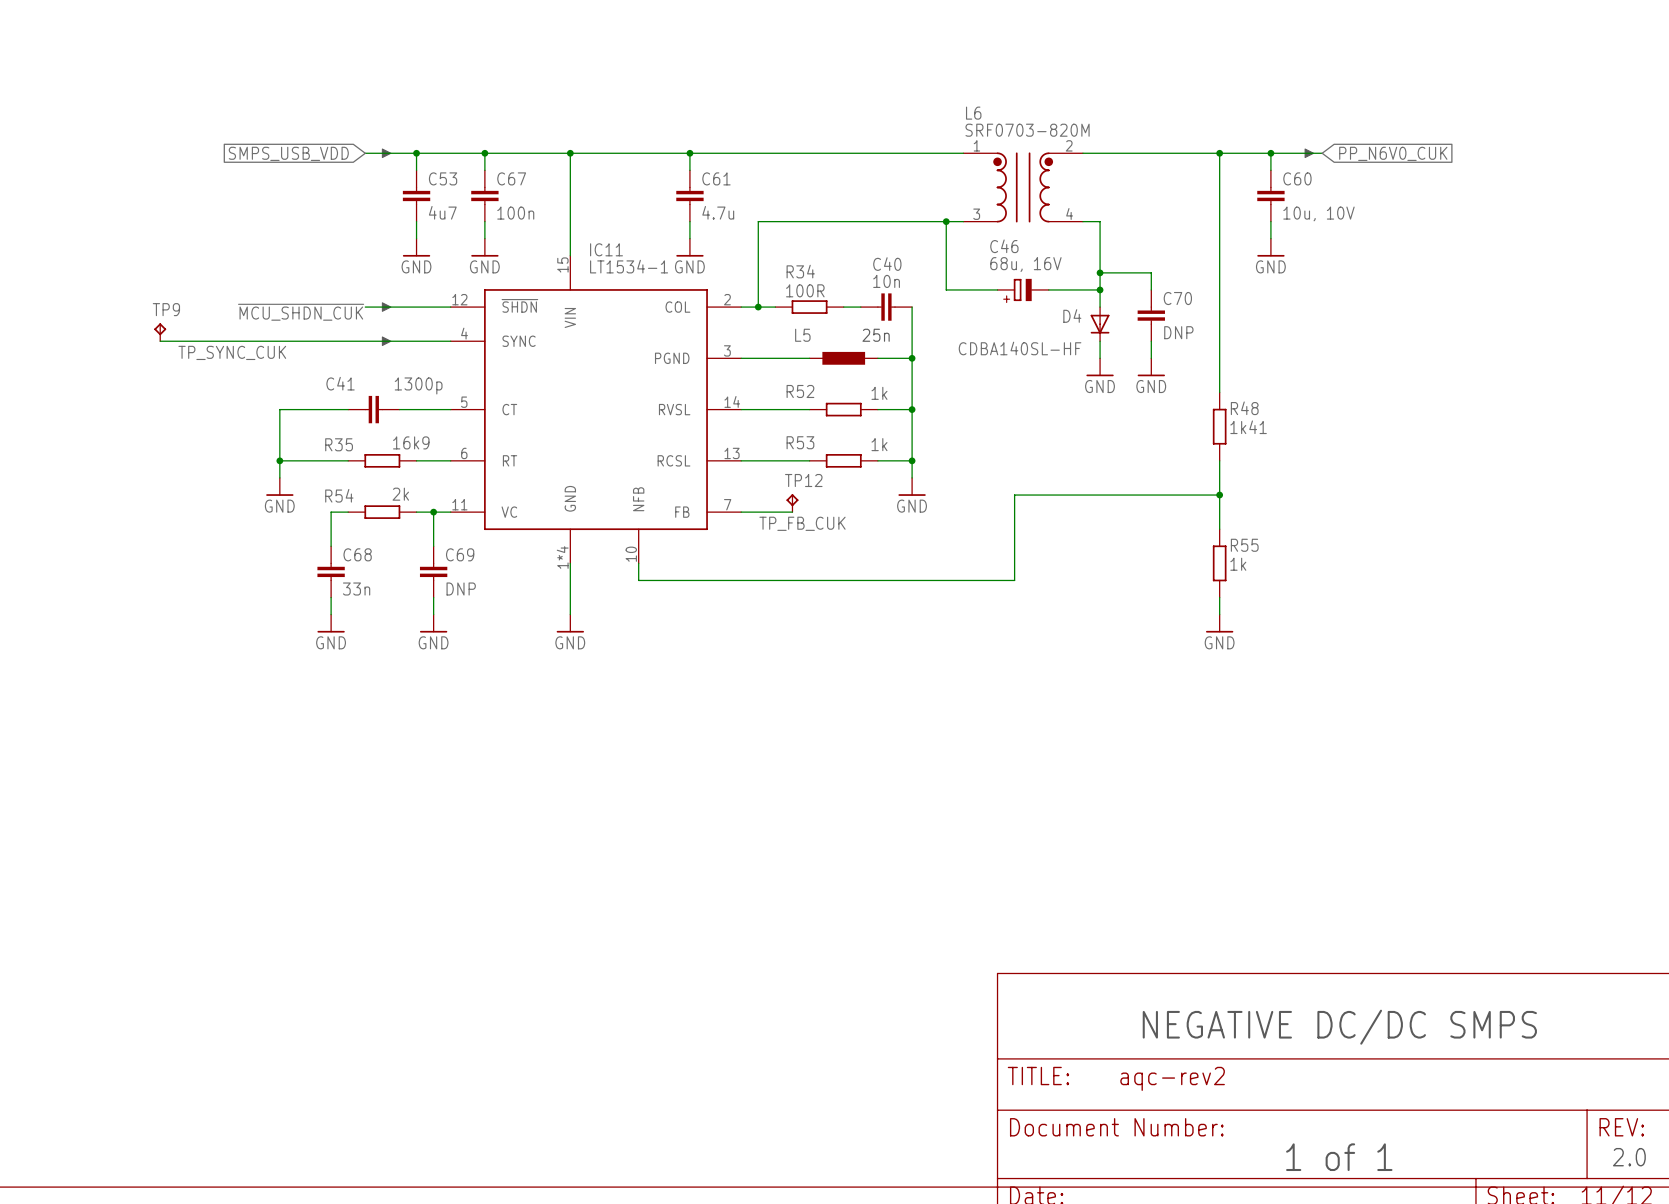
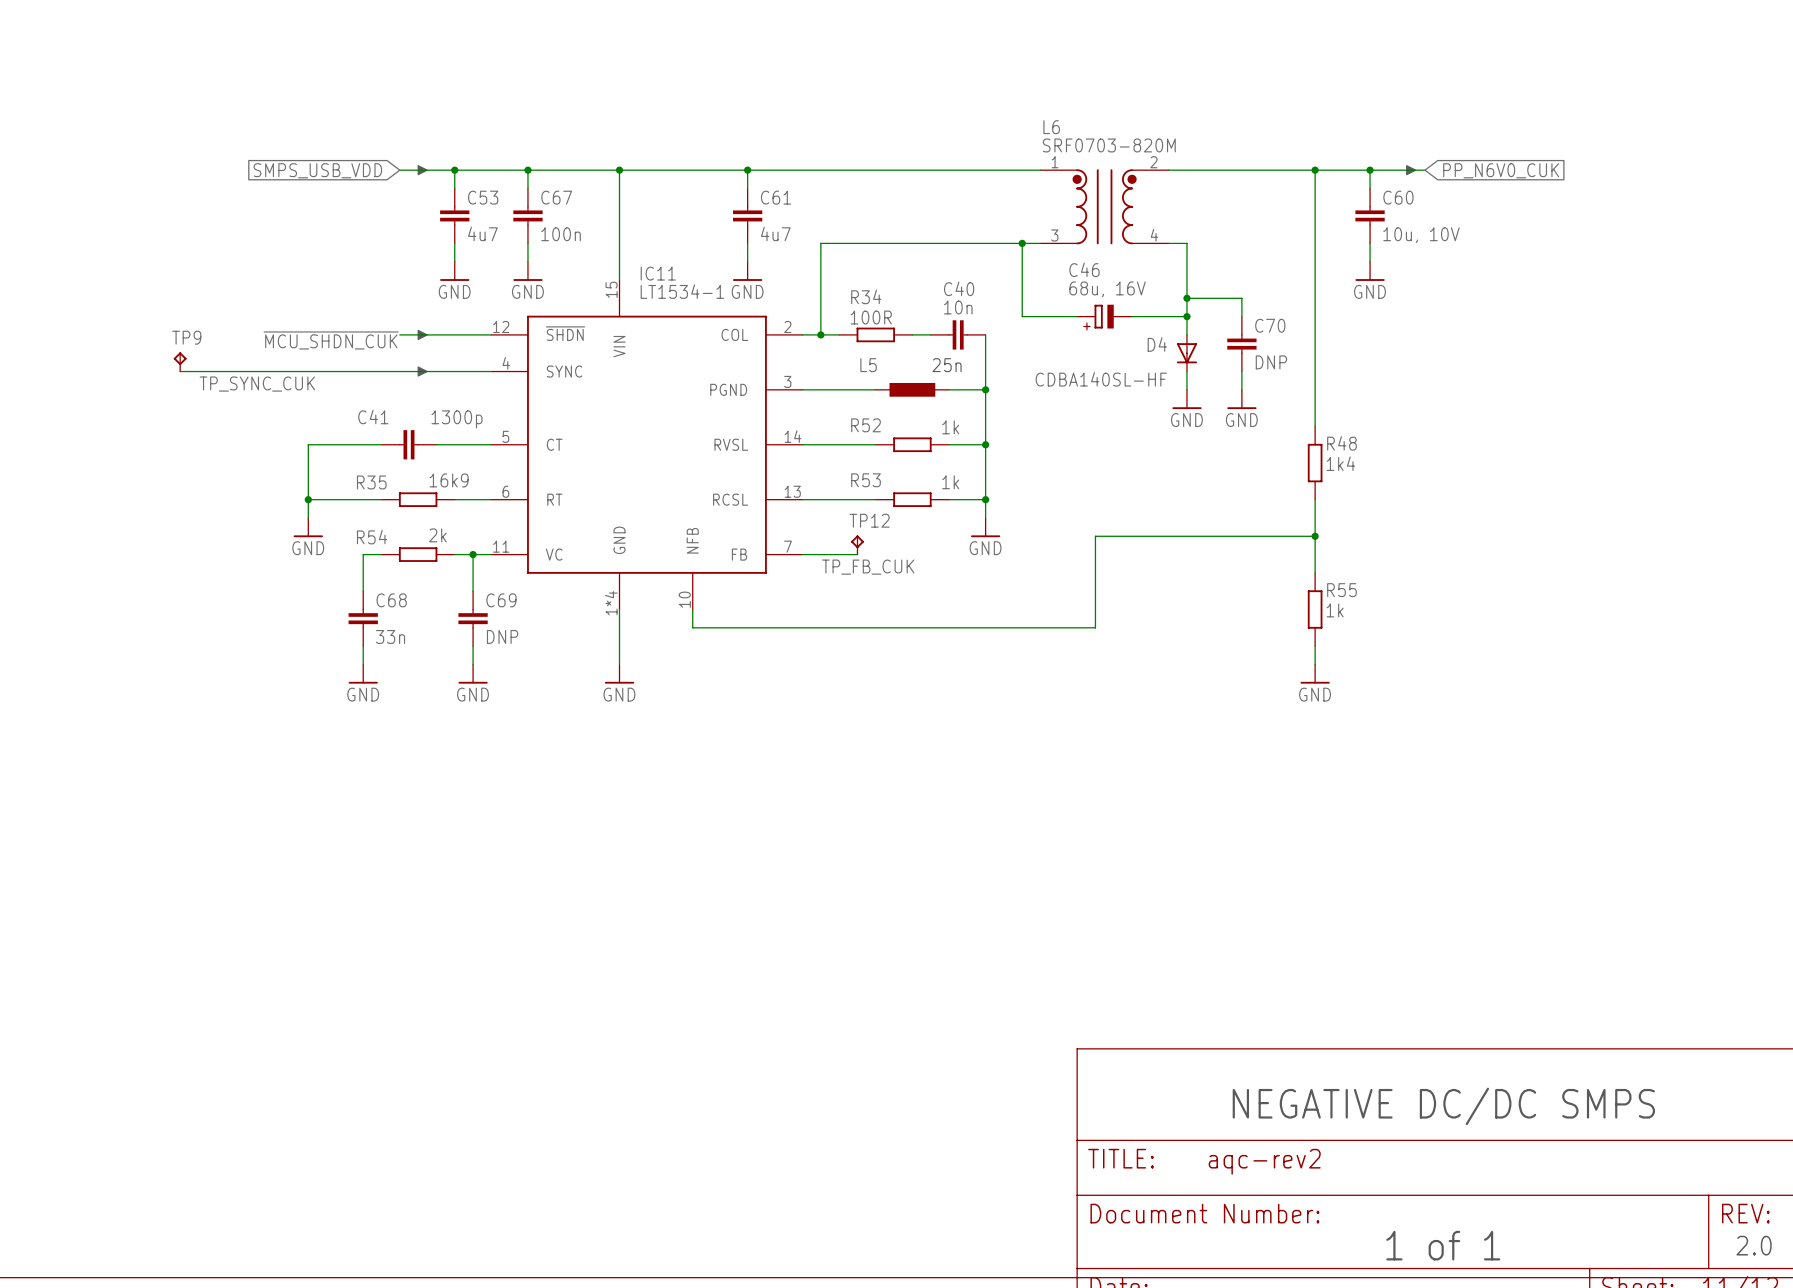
C61 value: 4.7u (718, 212) -> 4u7 (775, 233)
R48 value: 1k41 (1248, 427) -> 1k4 (1340, 463)

